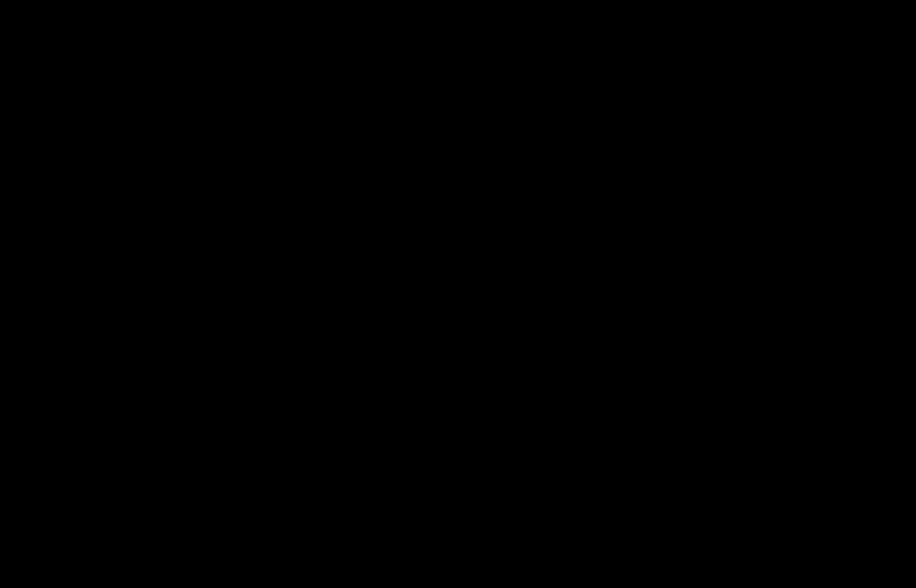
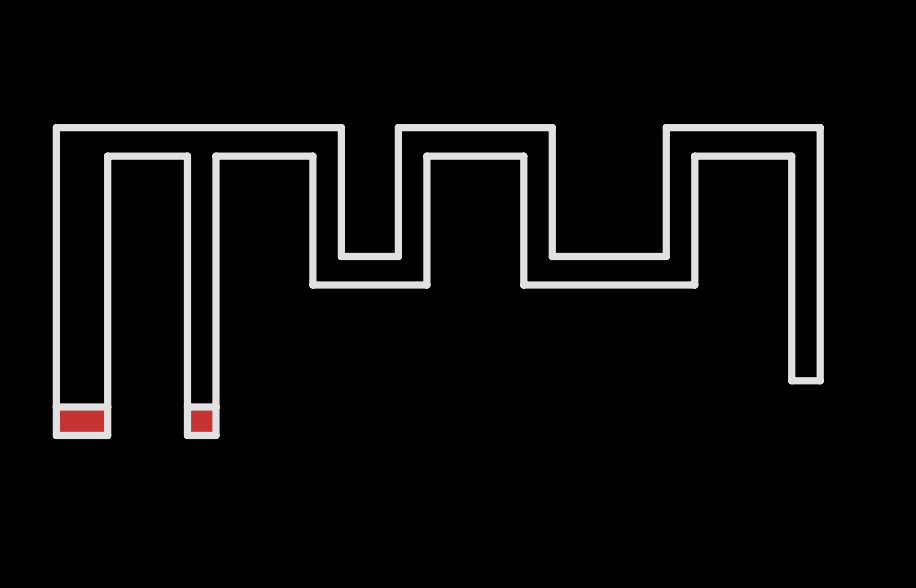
part: none -> (438, 281)

